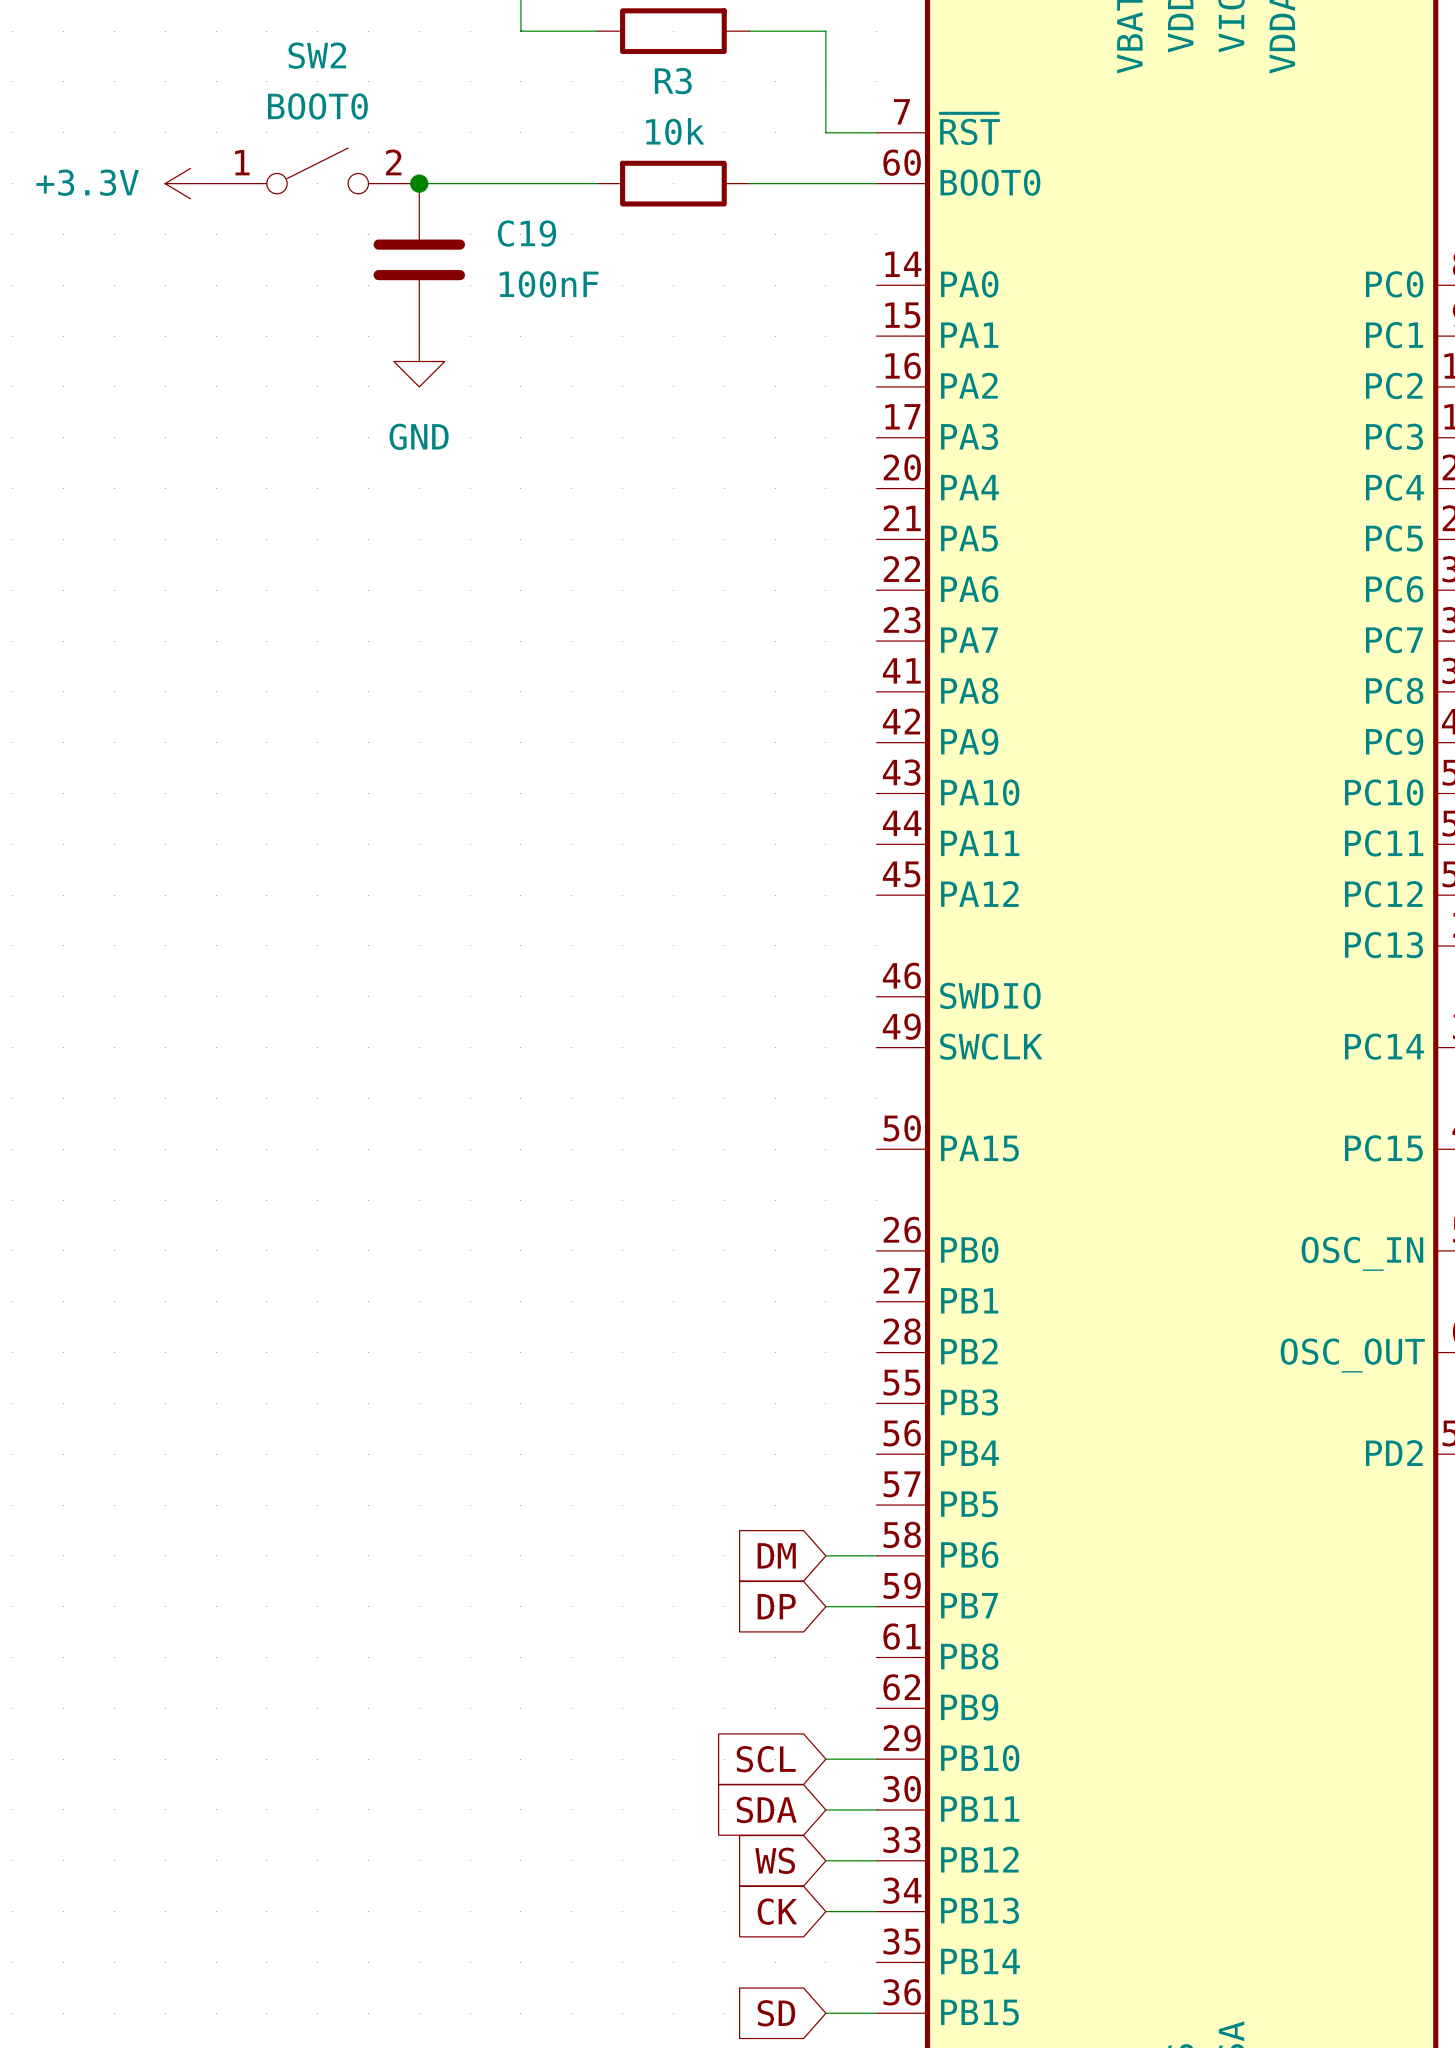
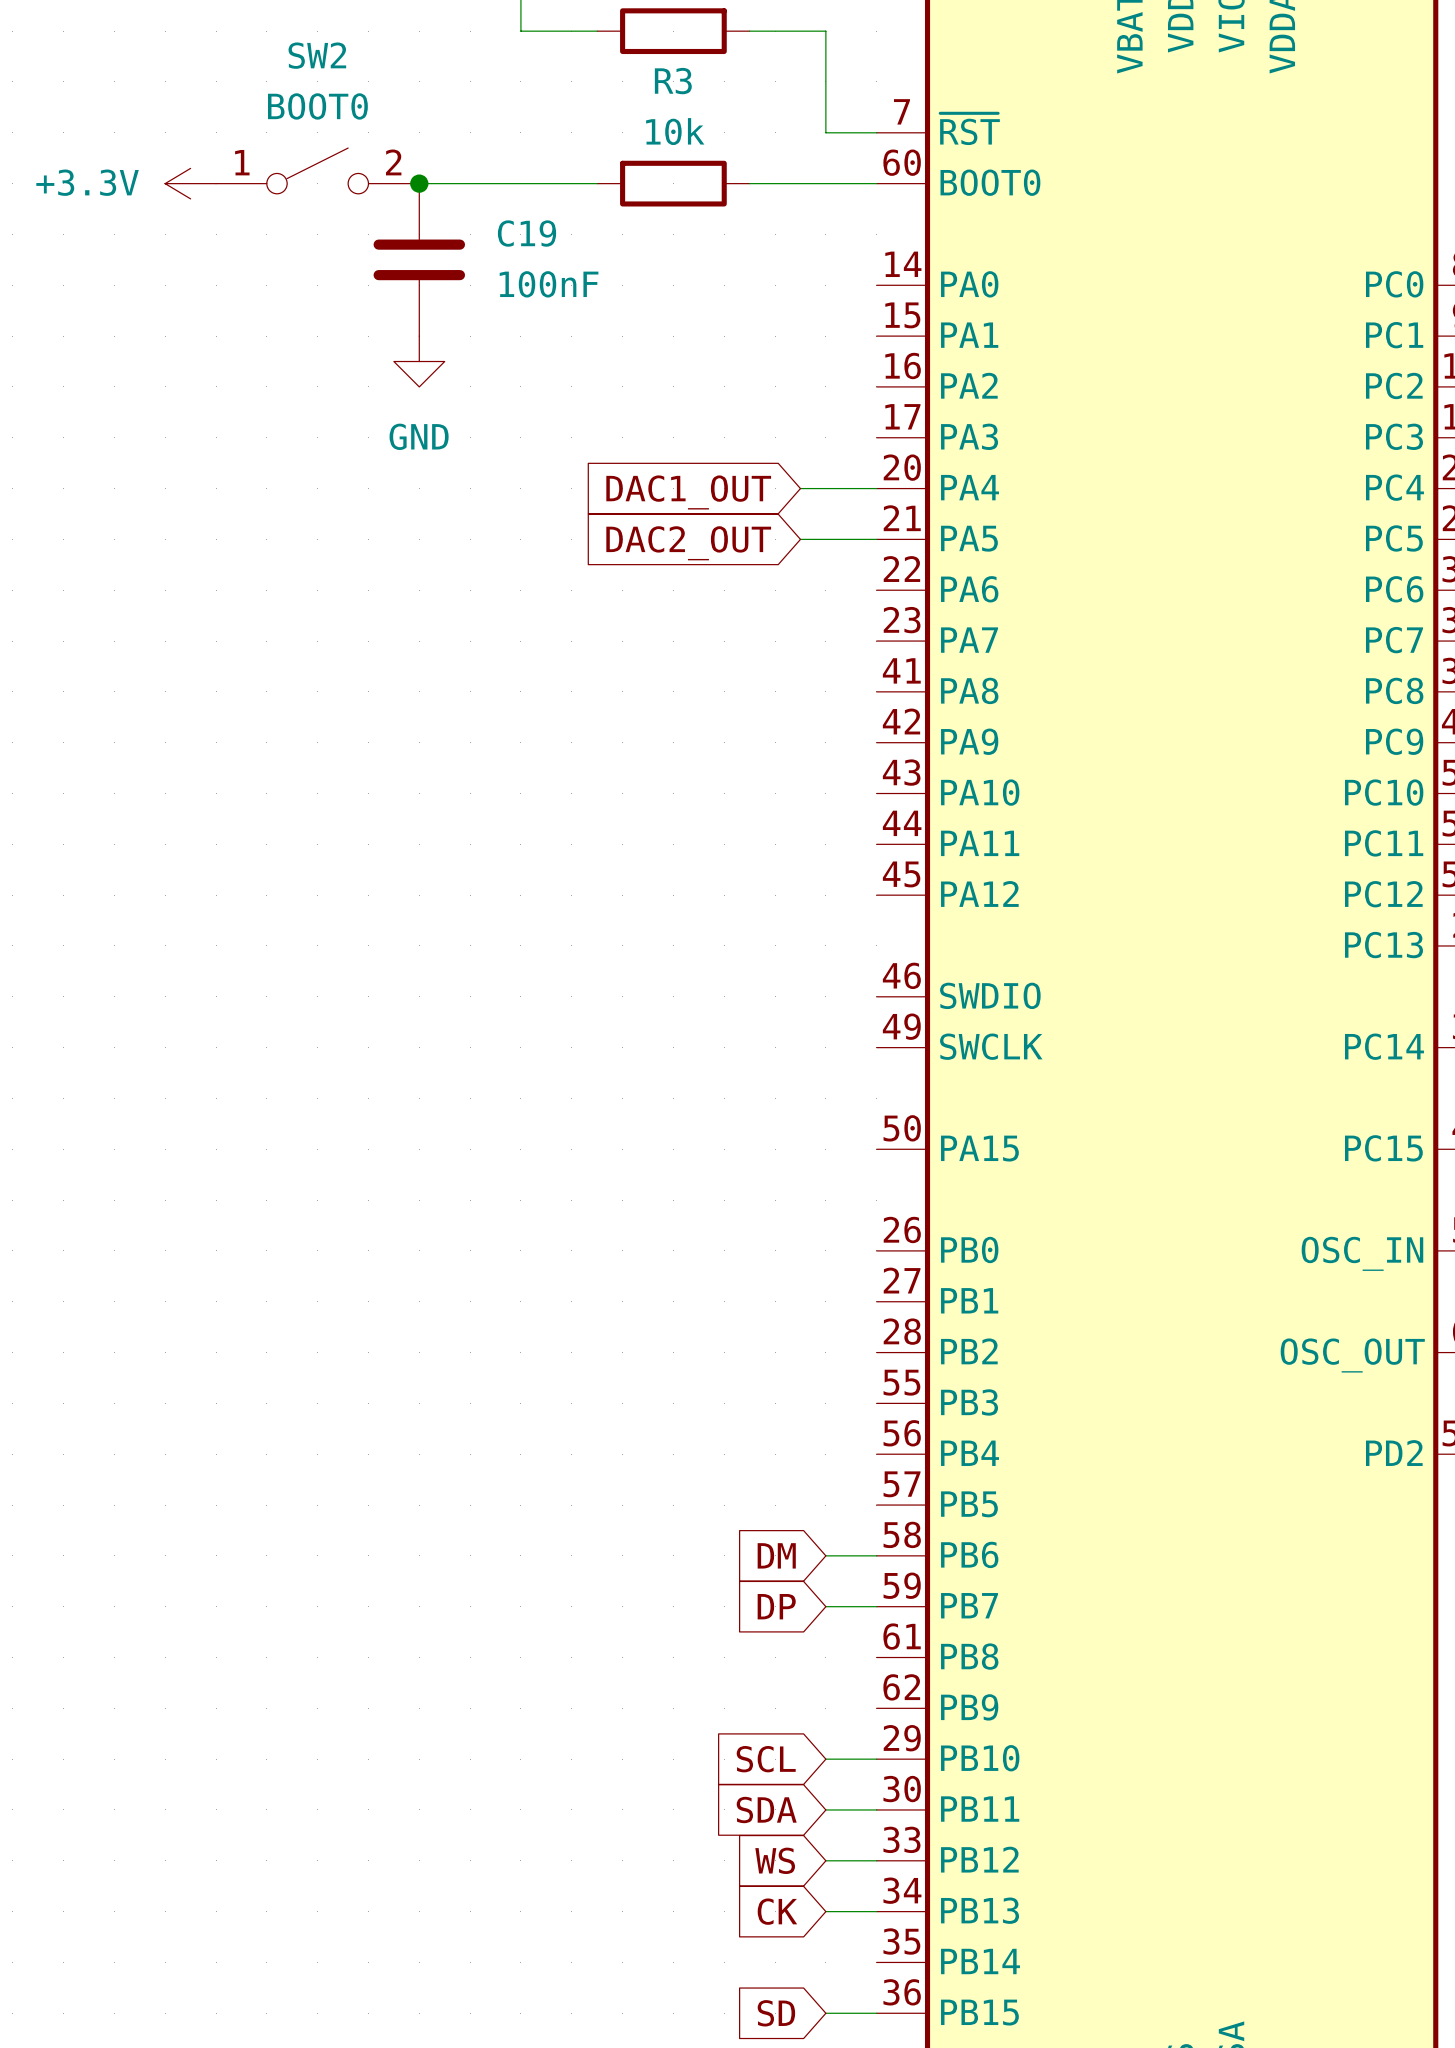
wire: none -> (800, 488) (876, 488)
global label: none -> DAC1_OUT (688, 492)
wire: none -> (800, 539) (876, 539)
global label: none -> DAC2_OUT (688, 543)

